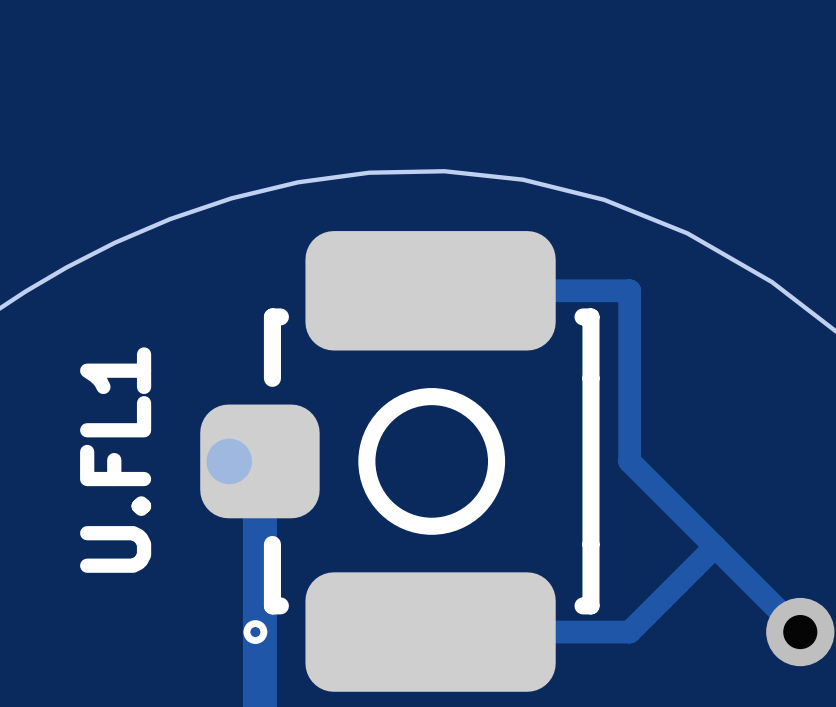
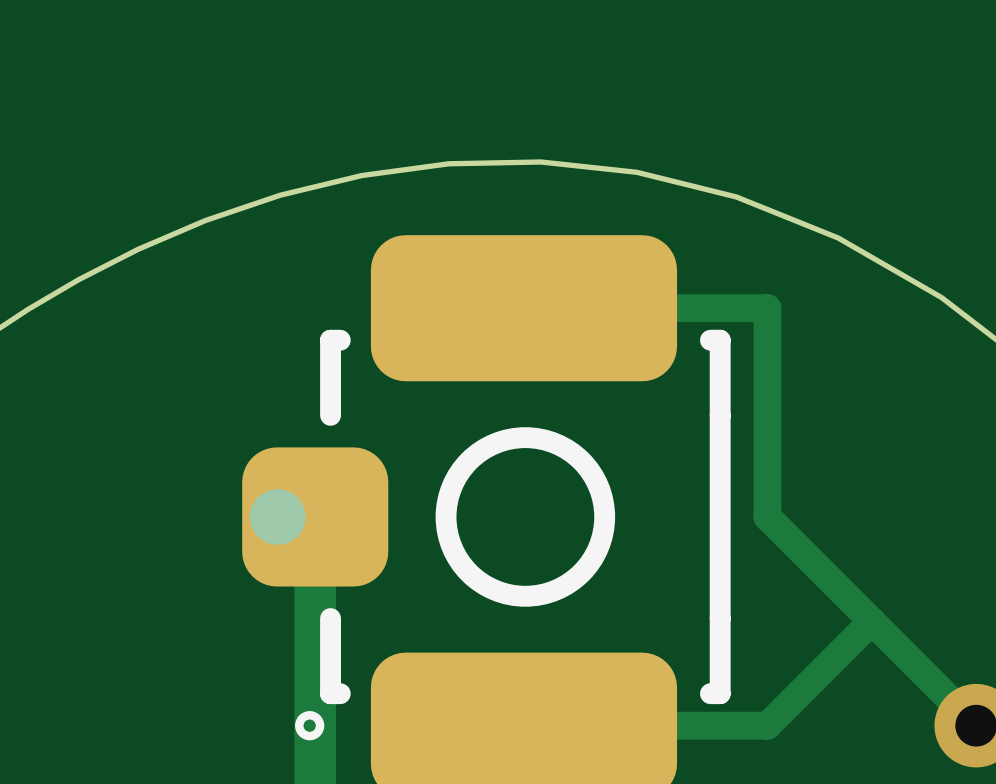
U.FL1 name: U.FL1 (115, 460) -> none

